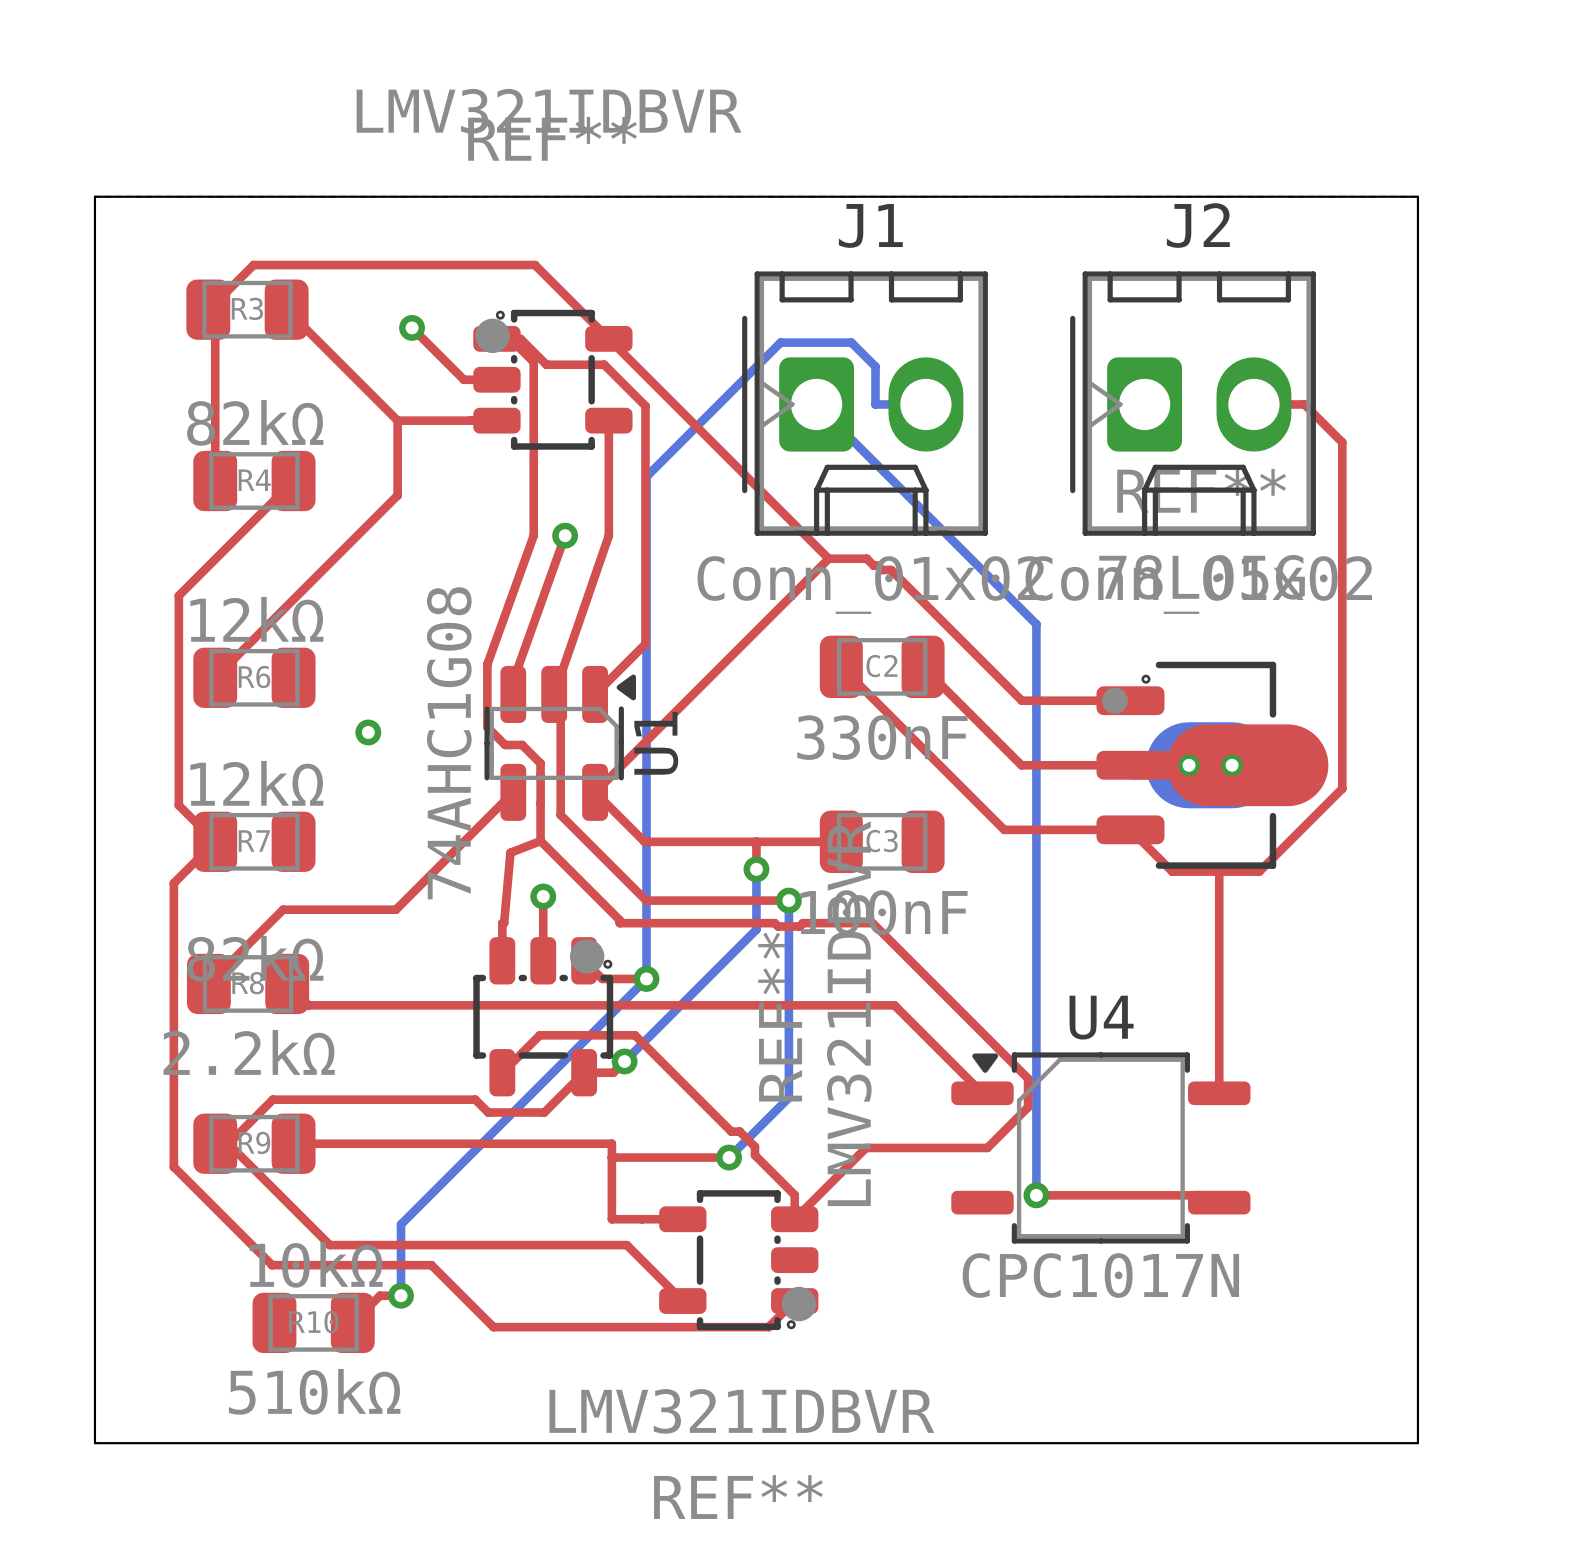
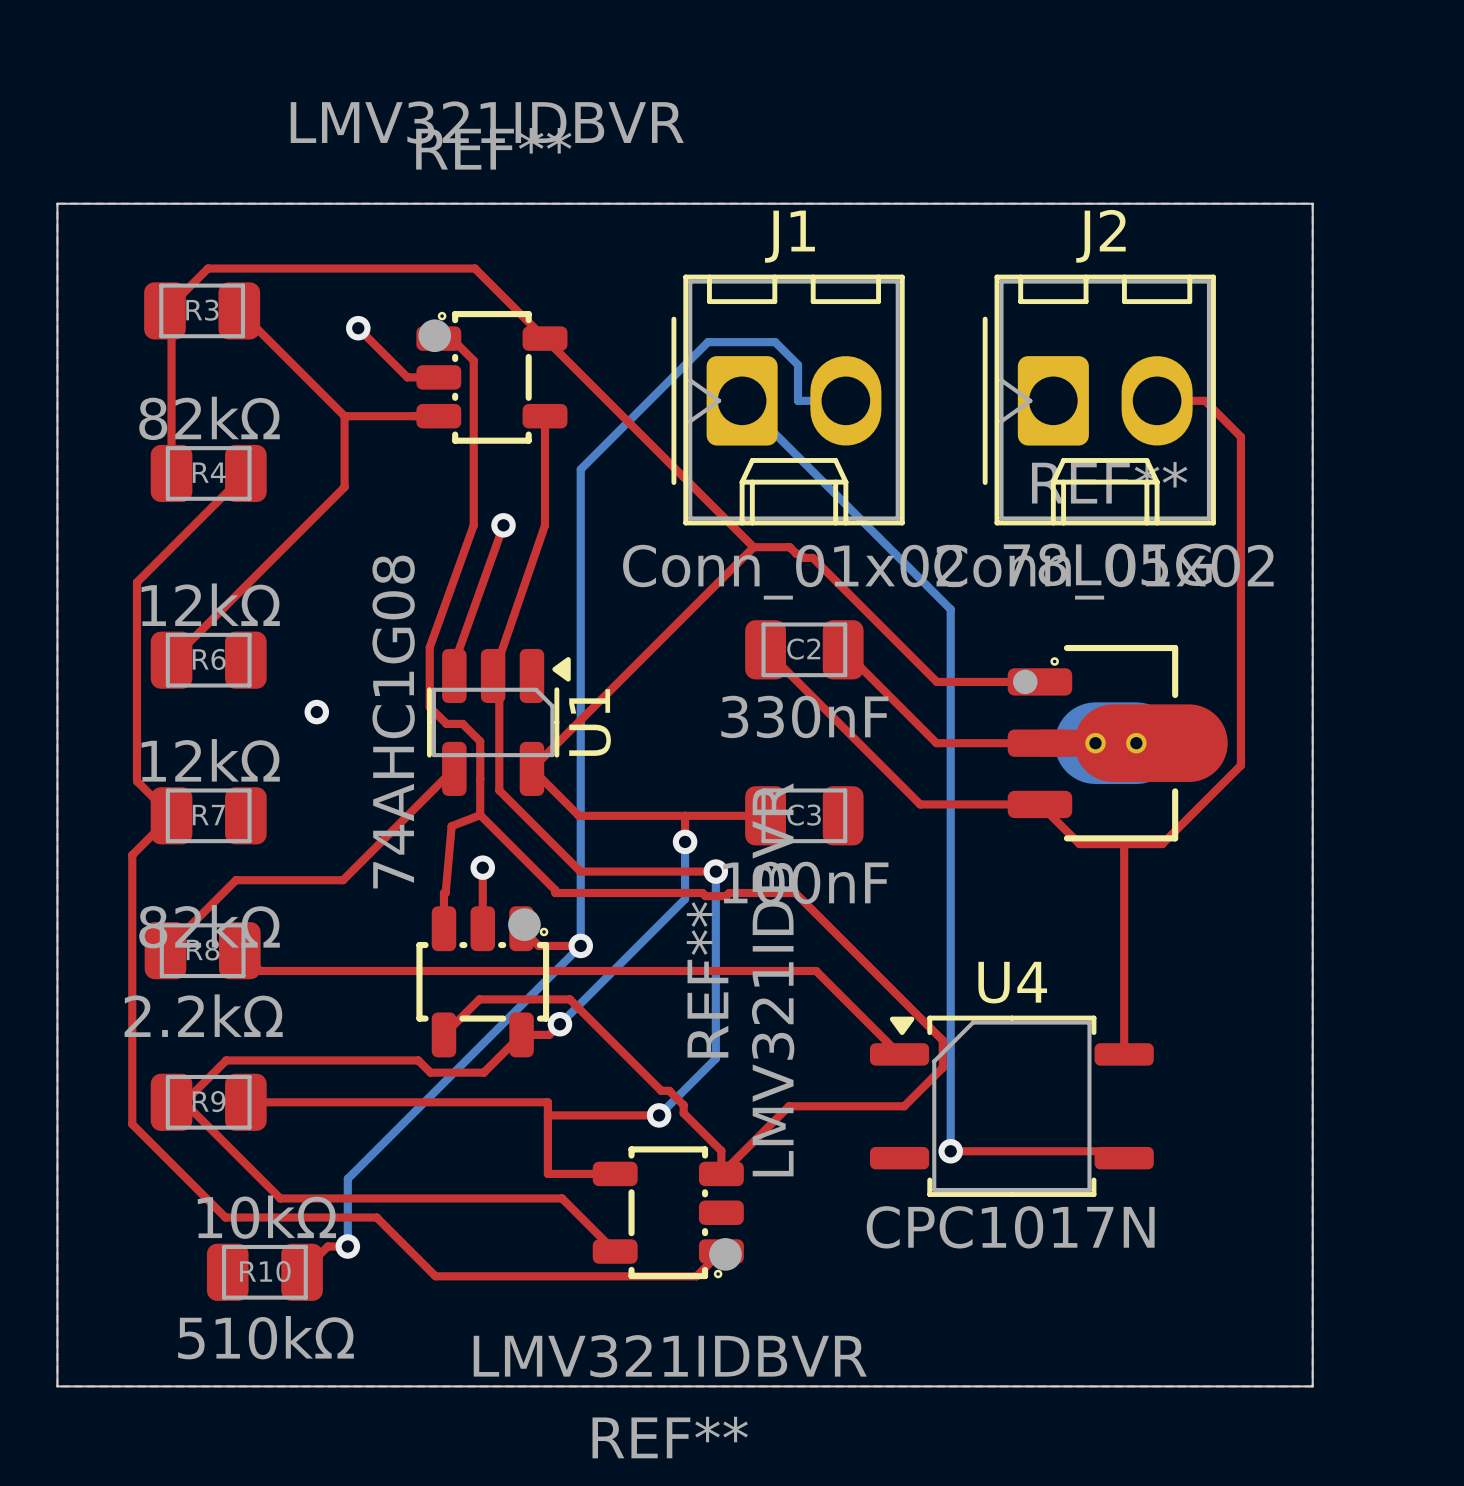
top track: (510, 338) (520, 338) (546, 364) (604, 364) (645, 405) (645, 644) (595, 694) -> none

